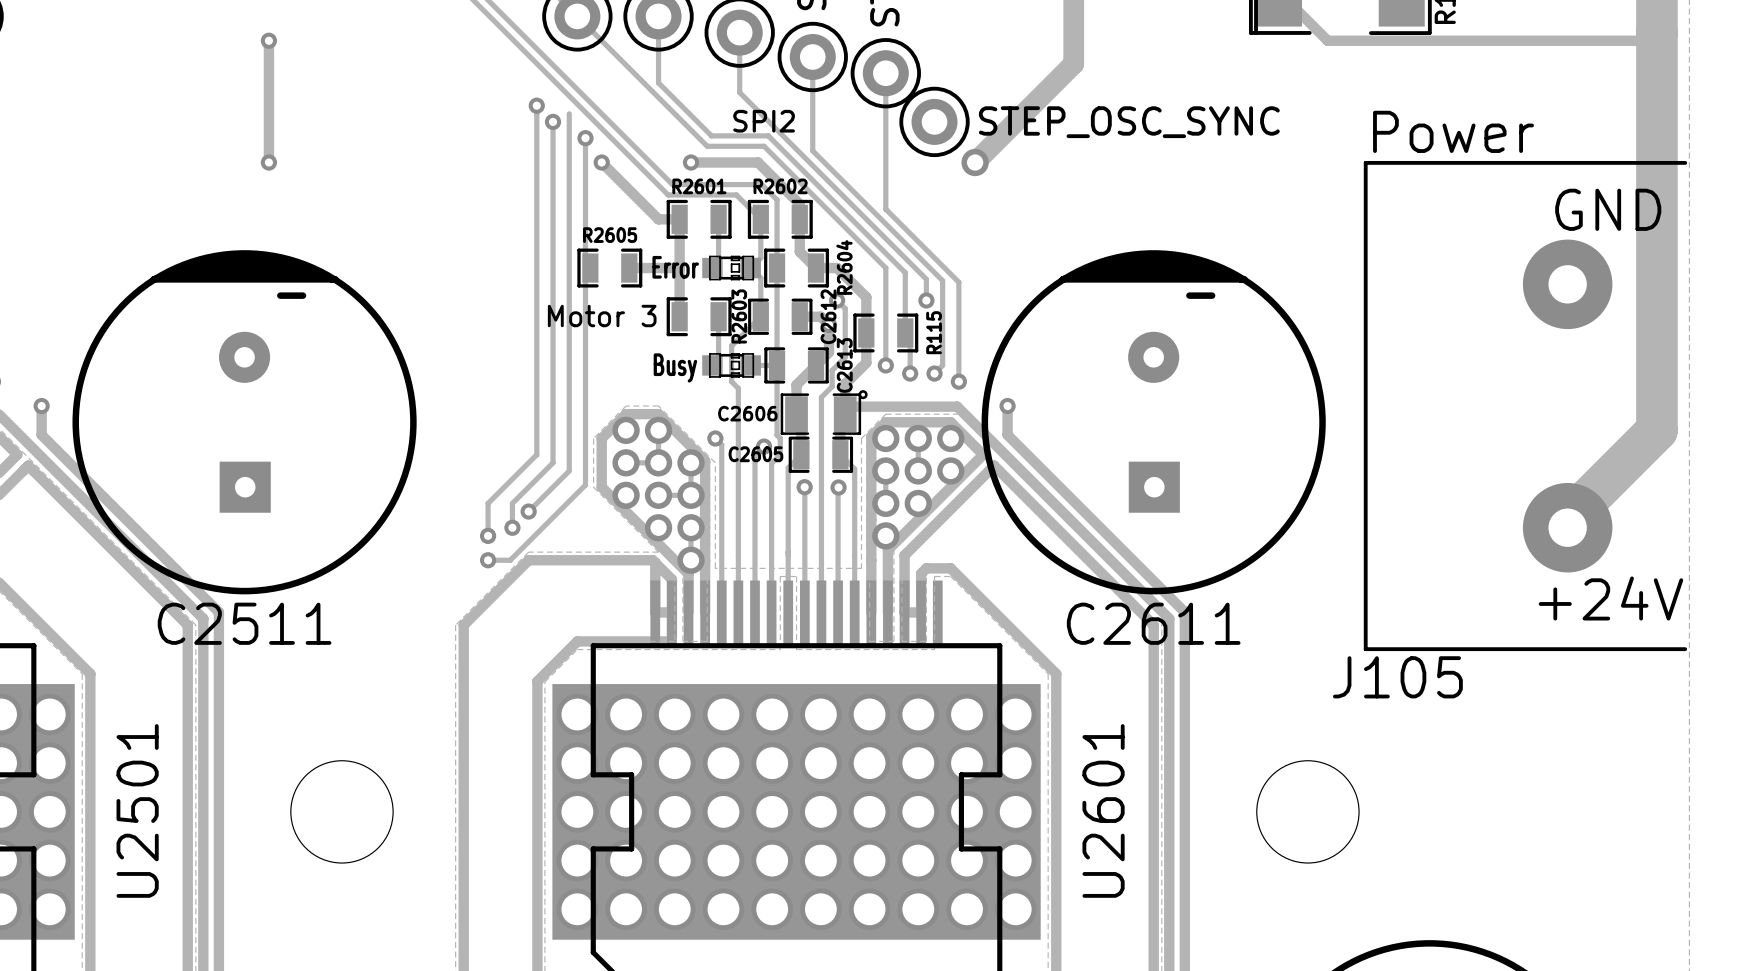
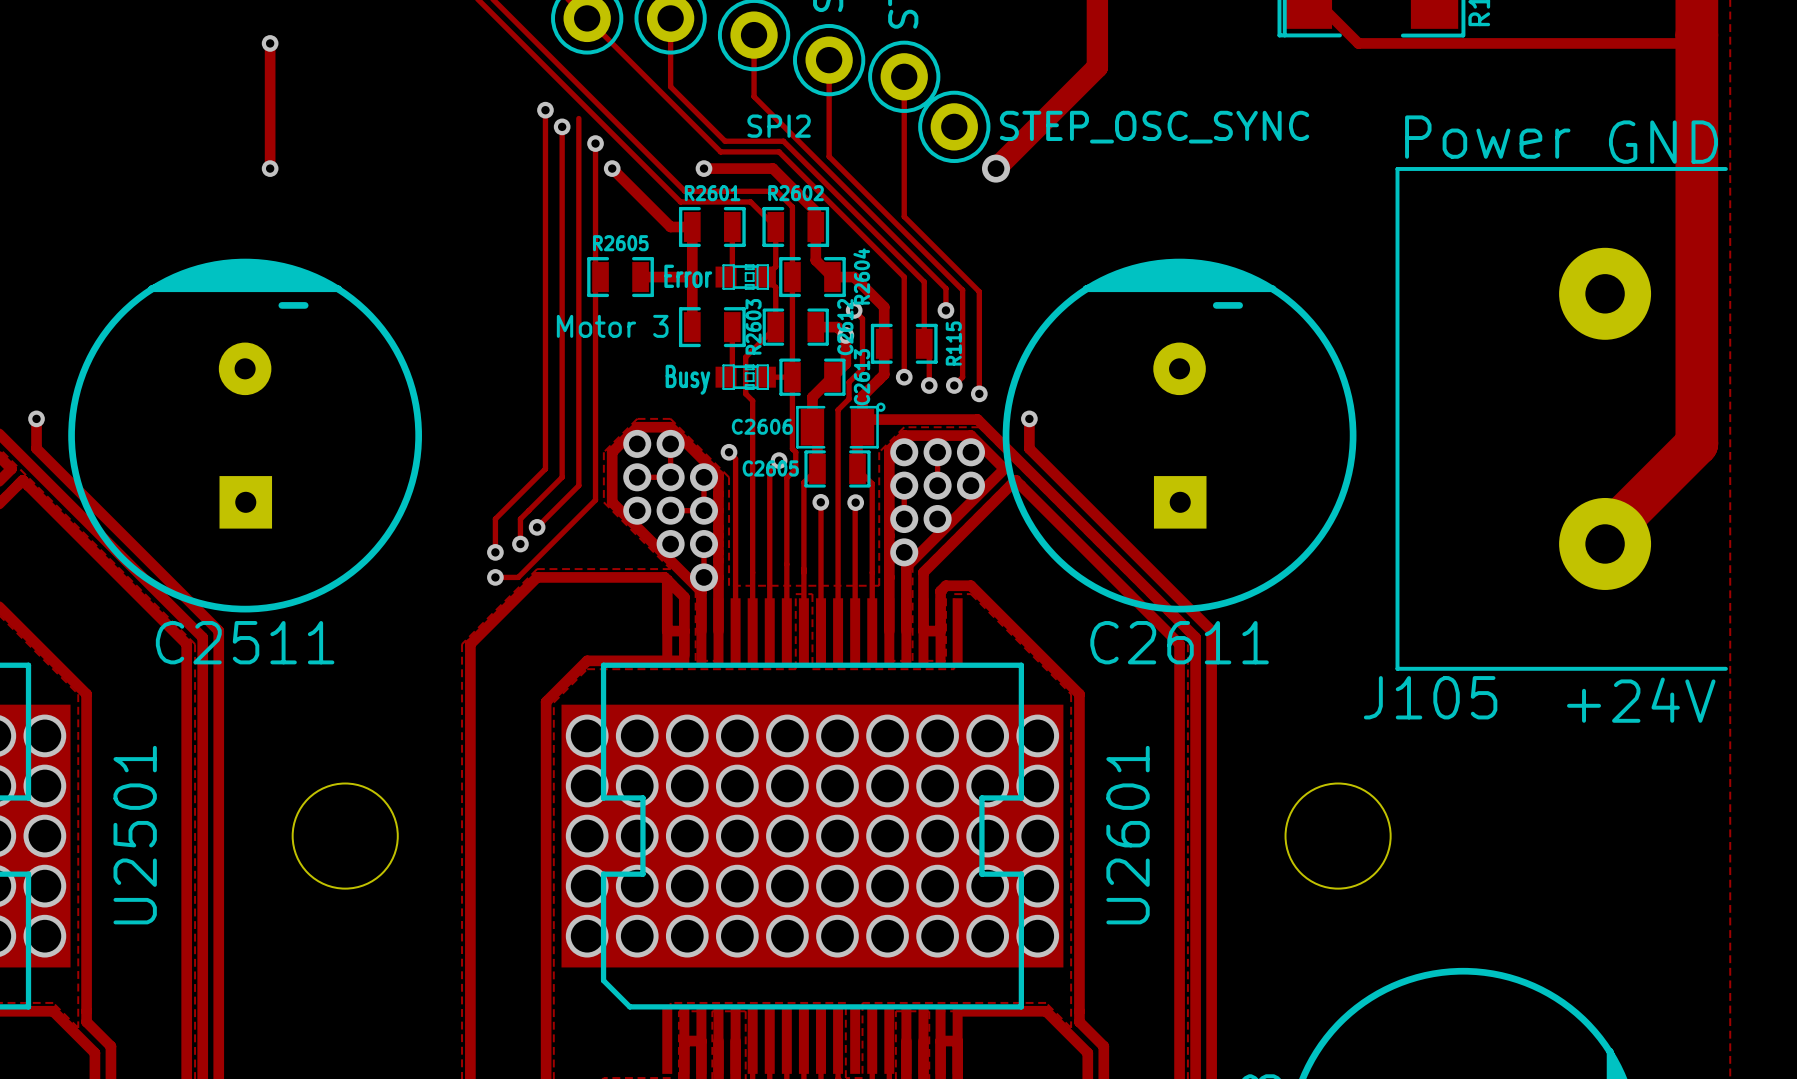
text position: GND (1608, 209) -> GND (1663, 142)
text position: +24V (1610, 598) -> +24V (1641, 700)

